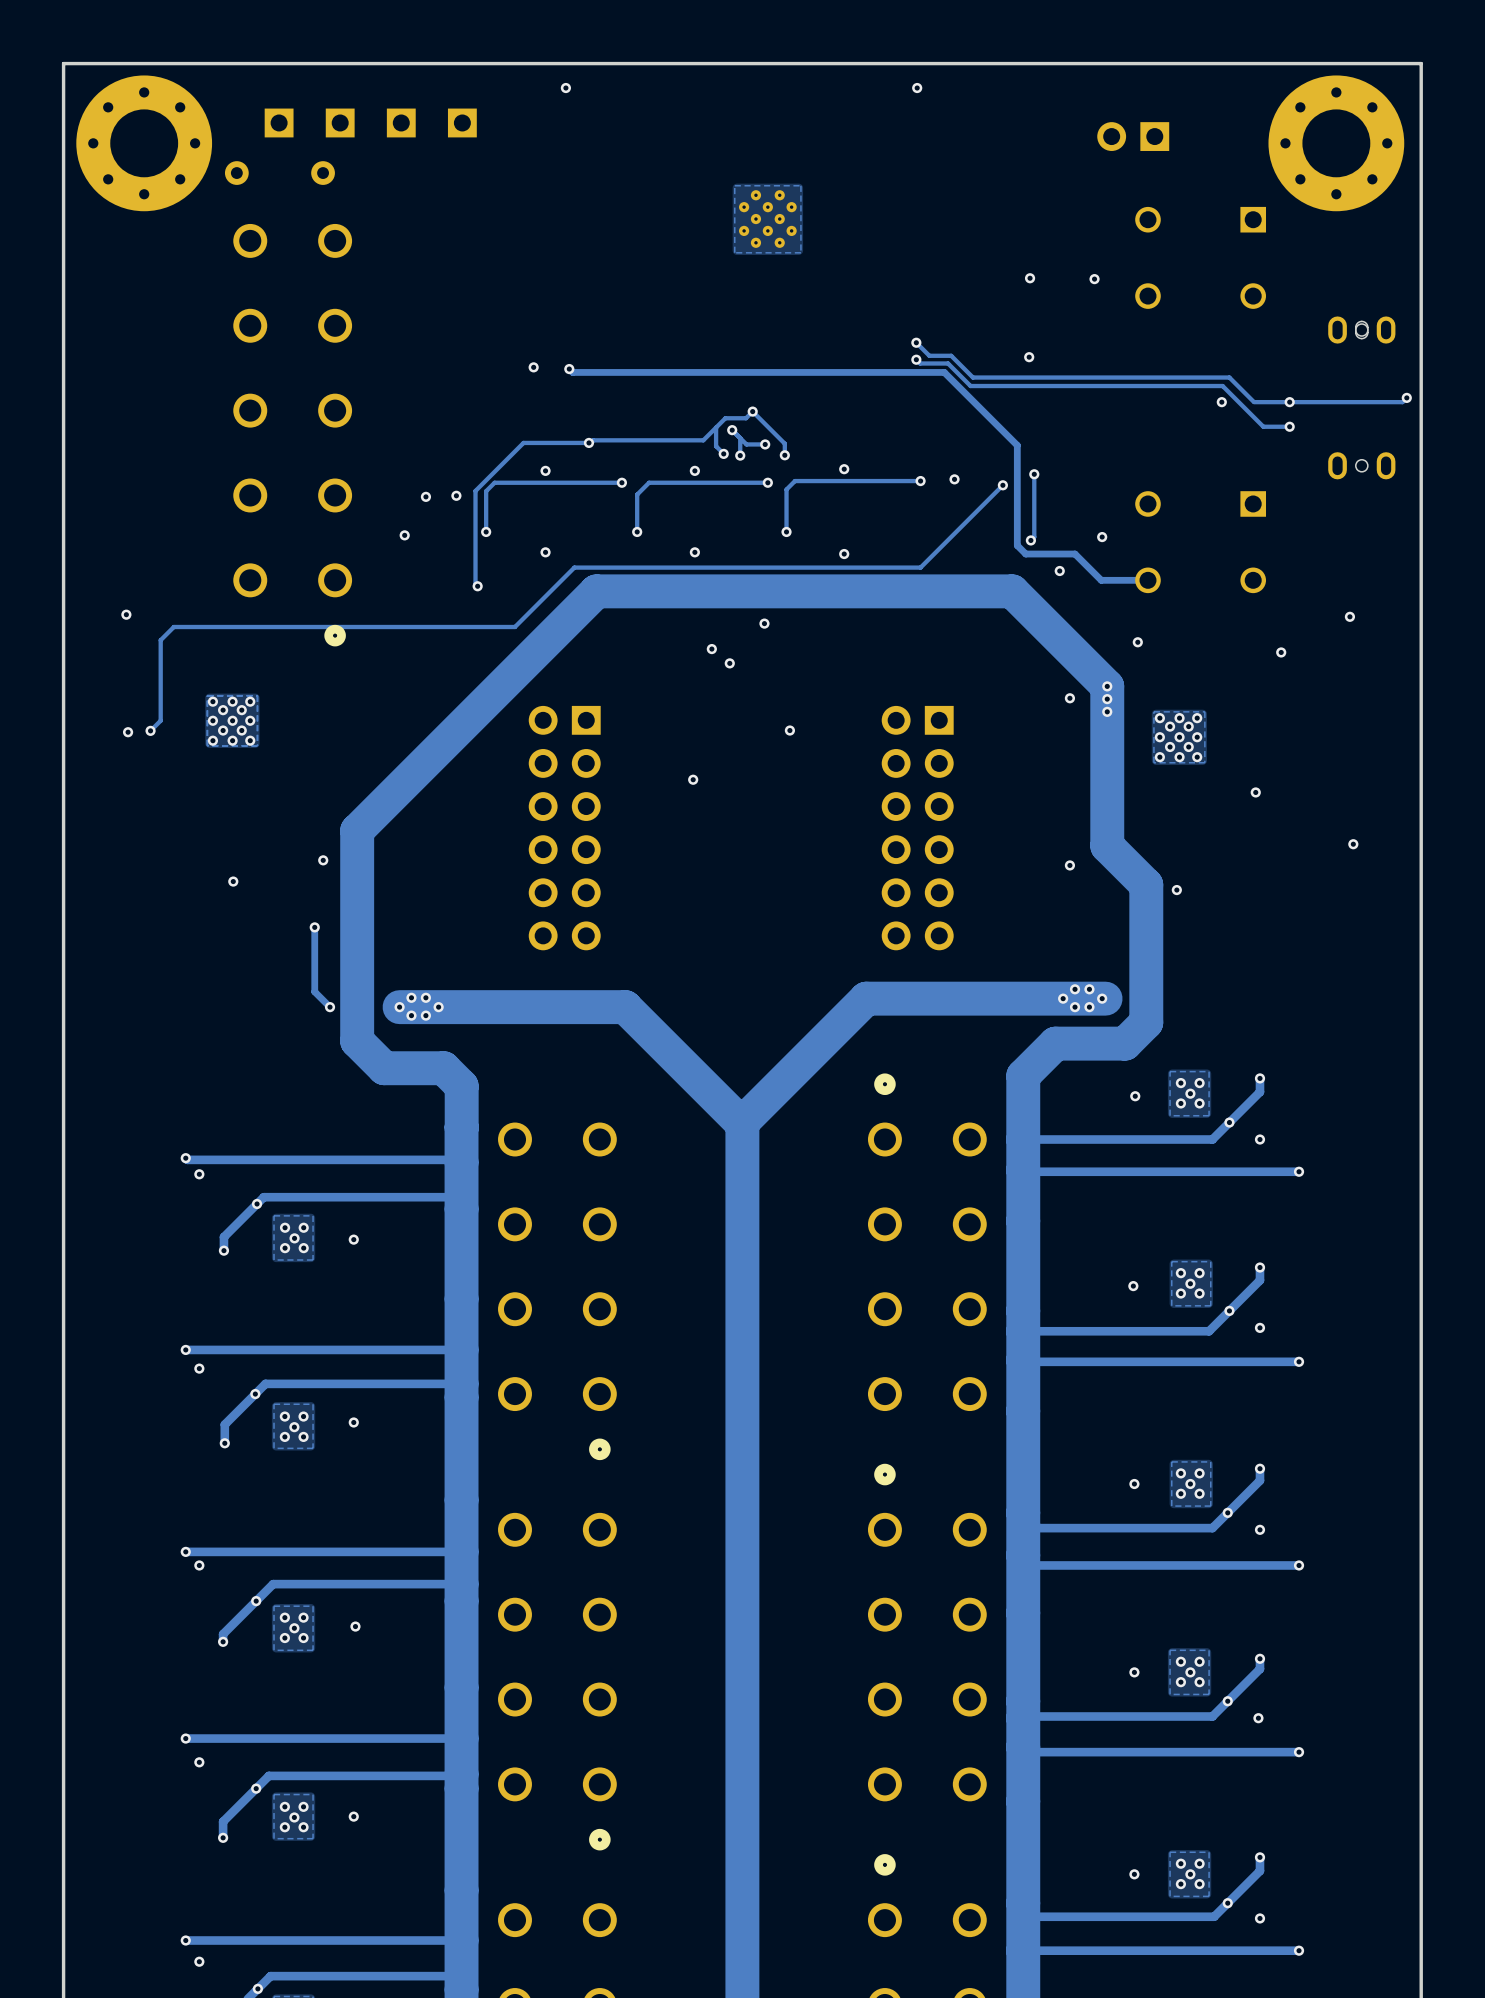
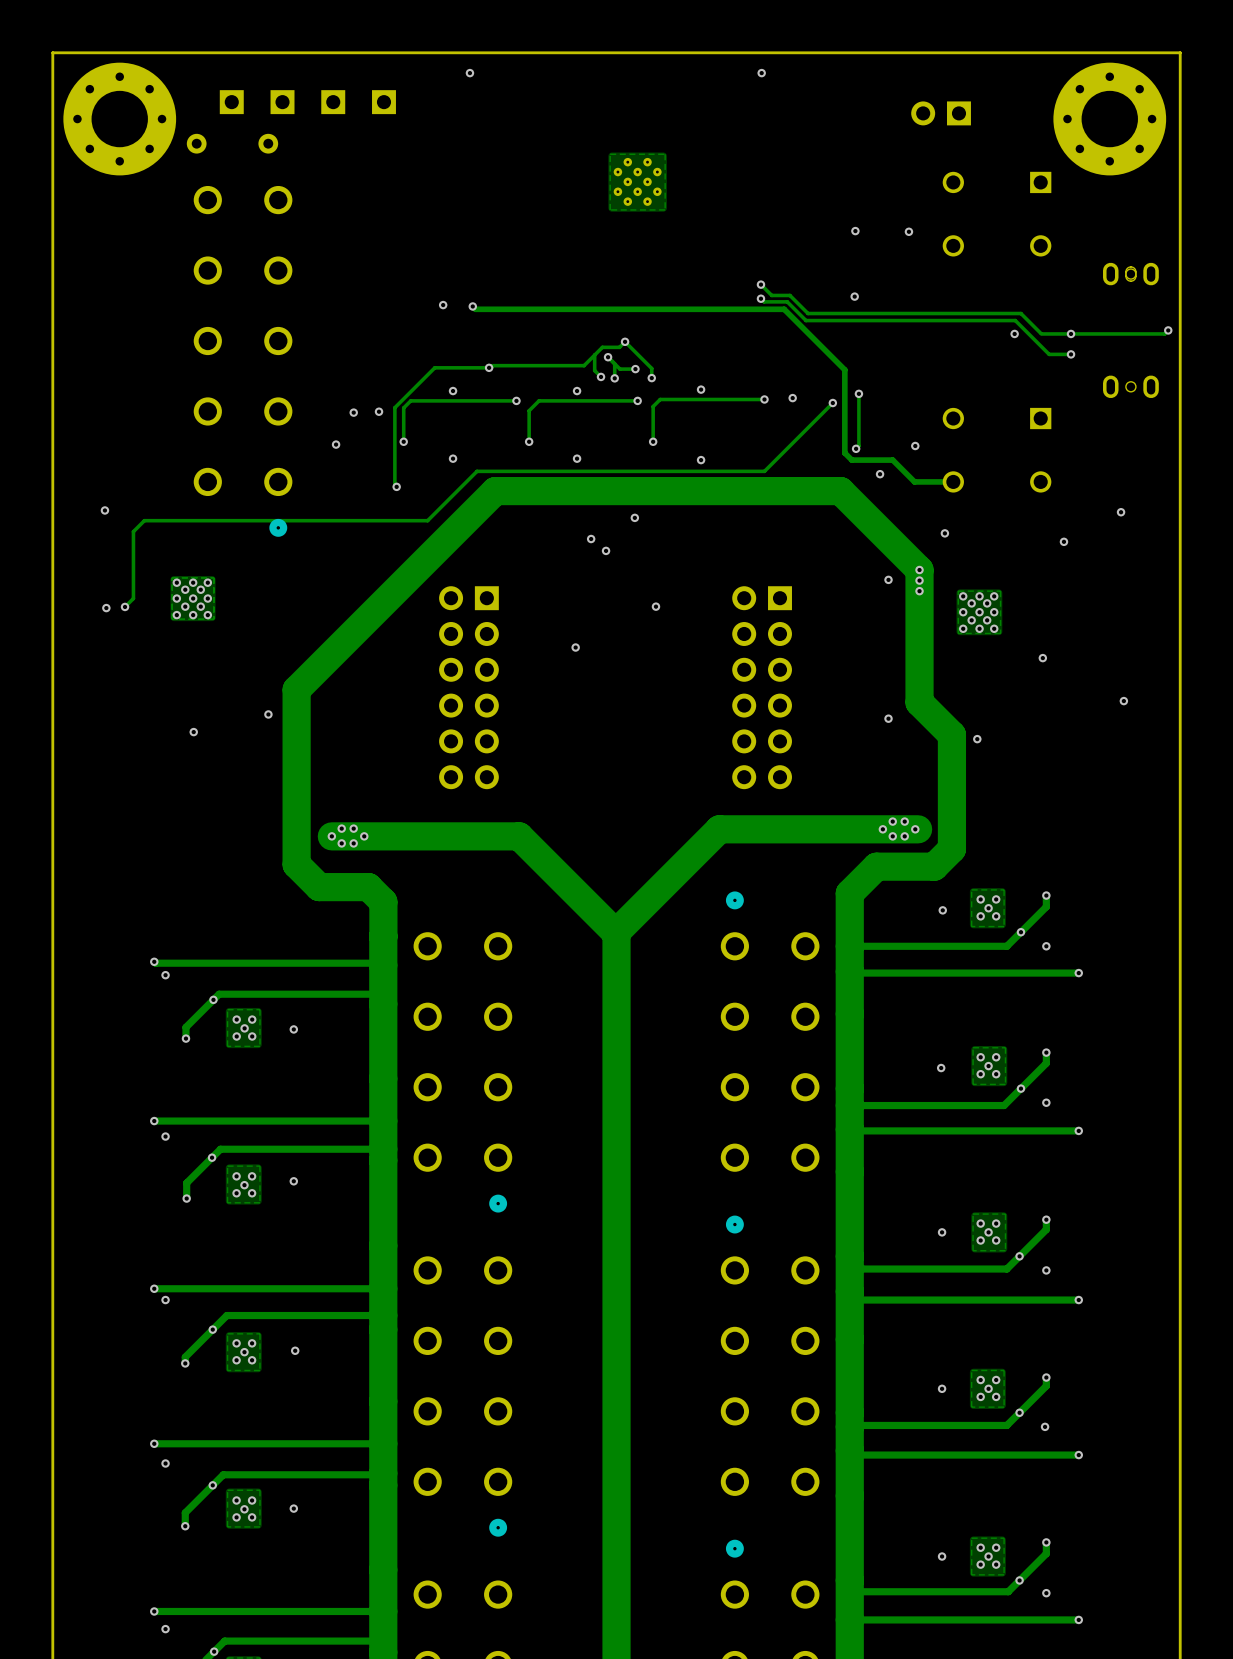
track: (314, 927) (314, 991) (330, 1007) -> none
via: (314, 927) -> none
via: (330, 1007) -> none

